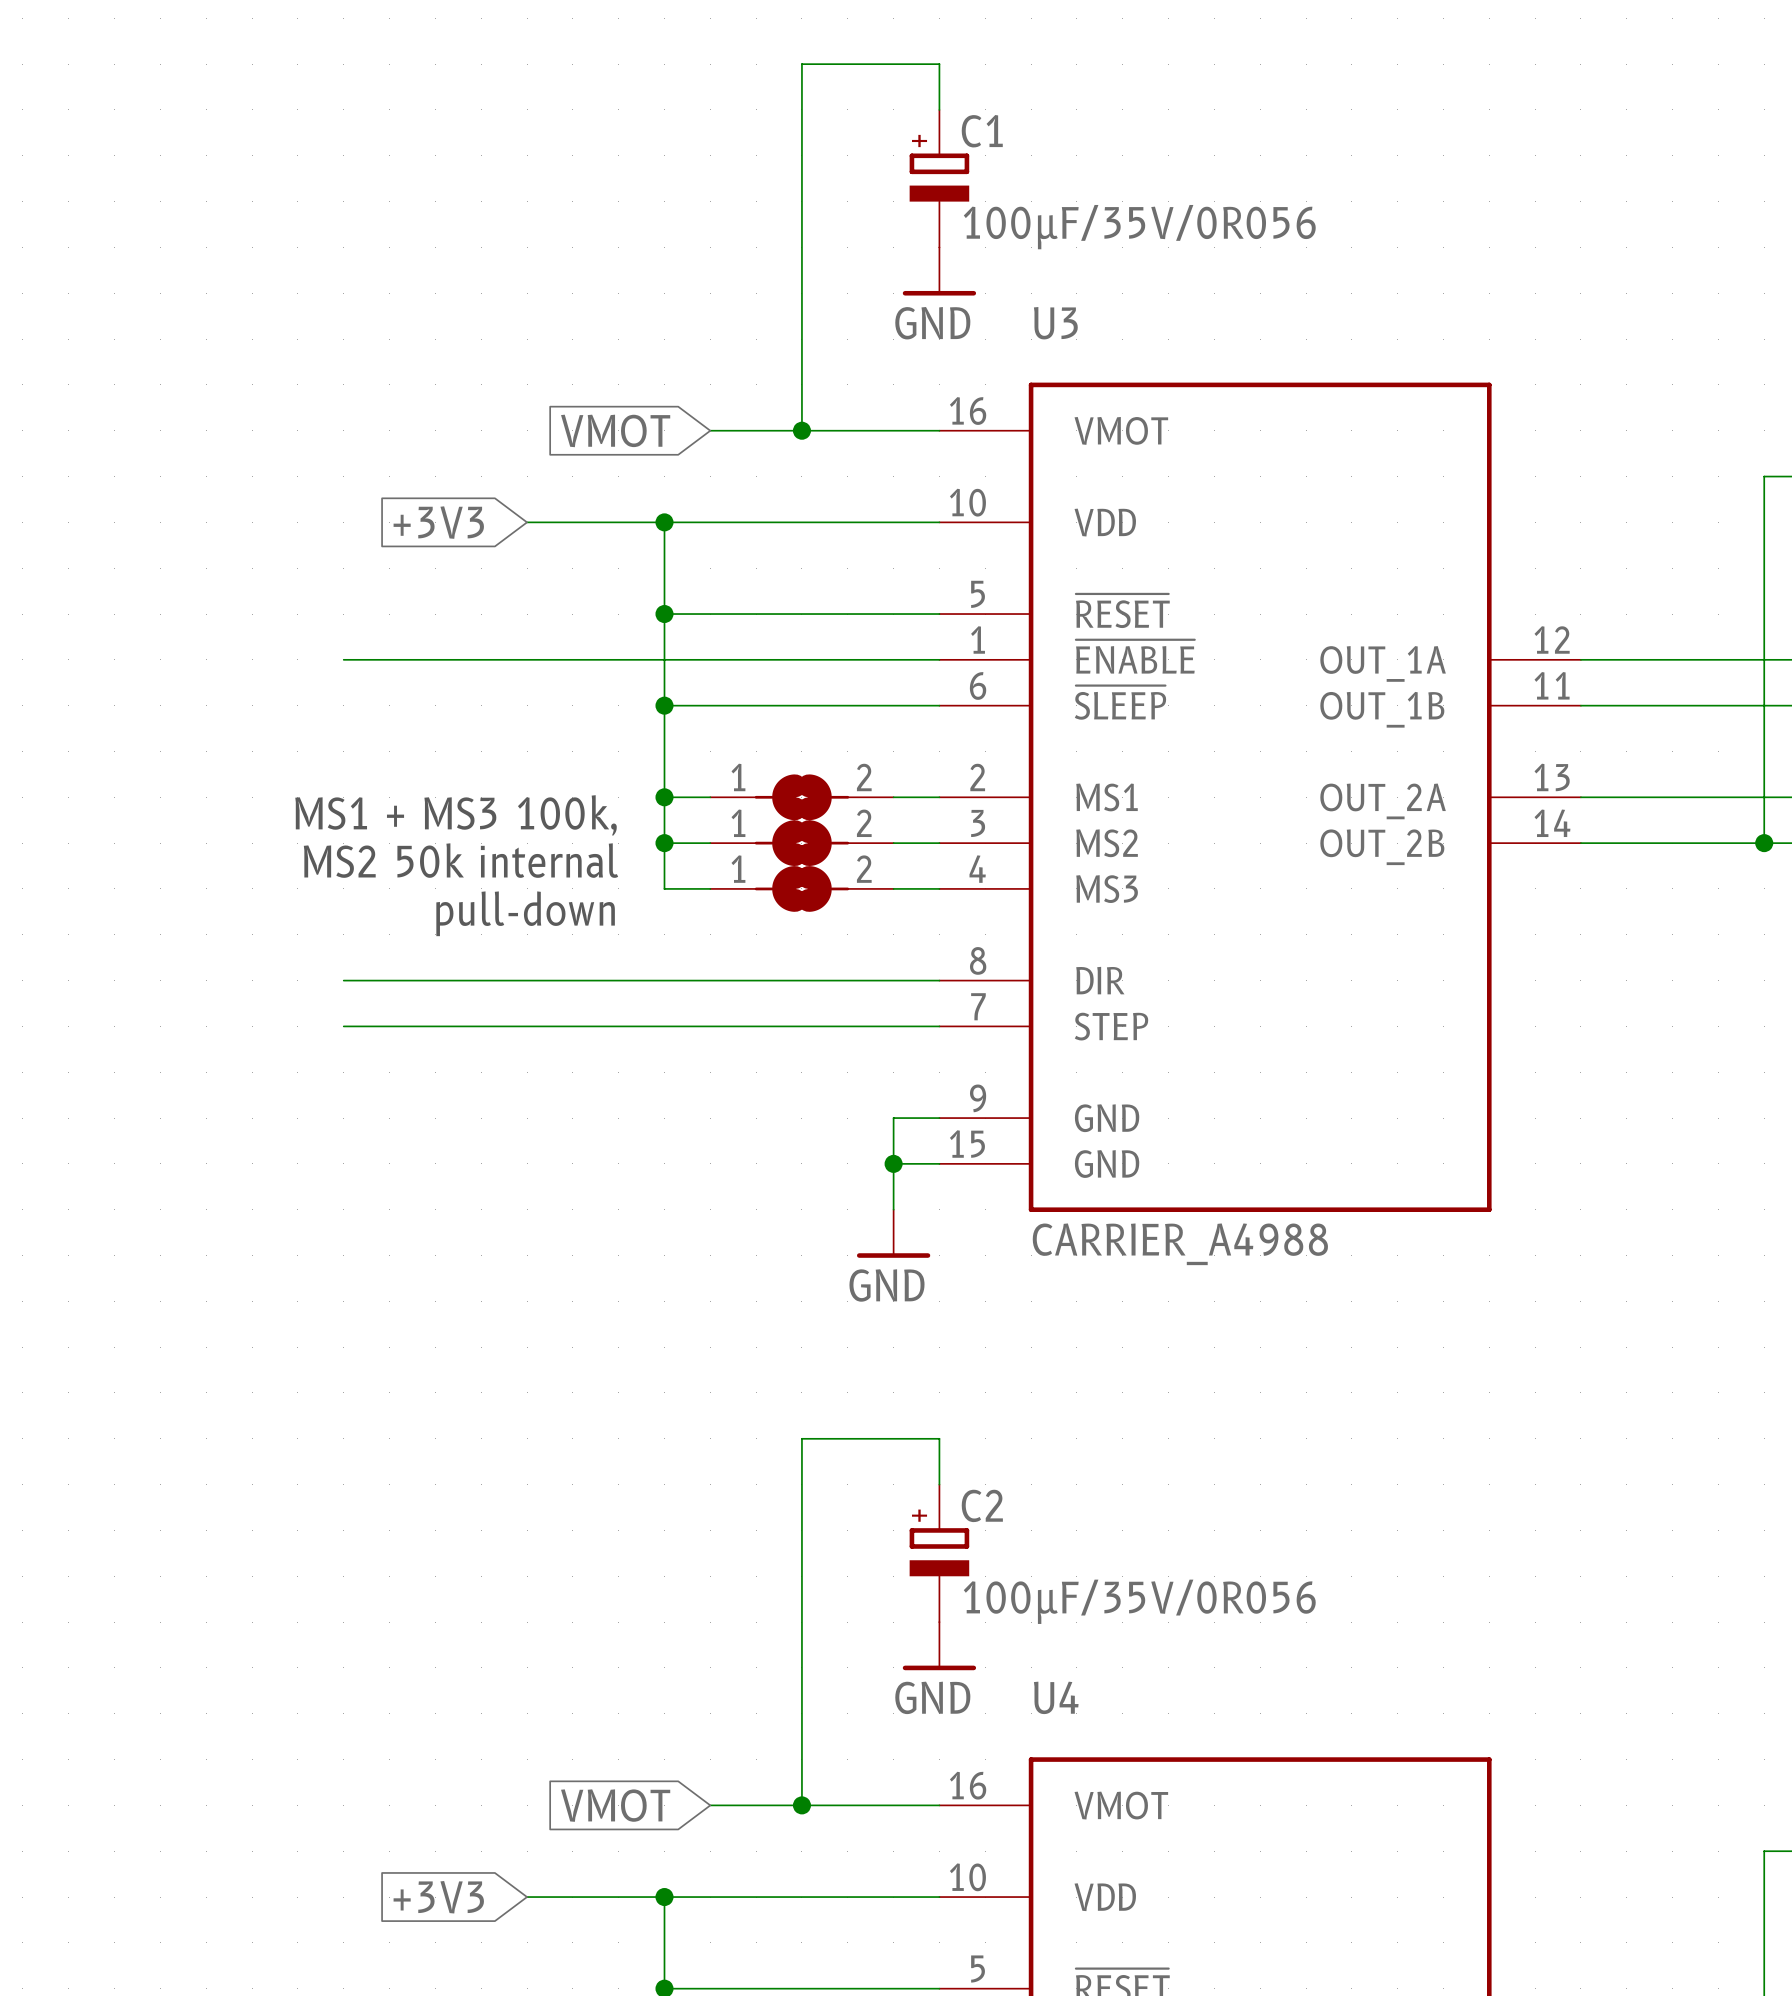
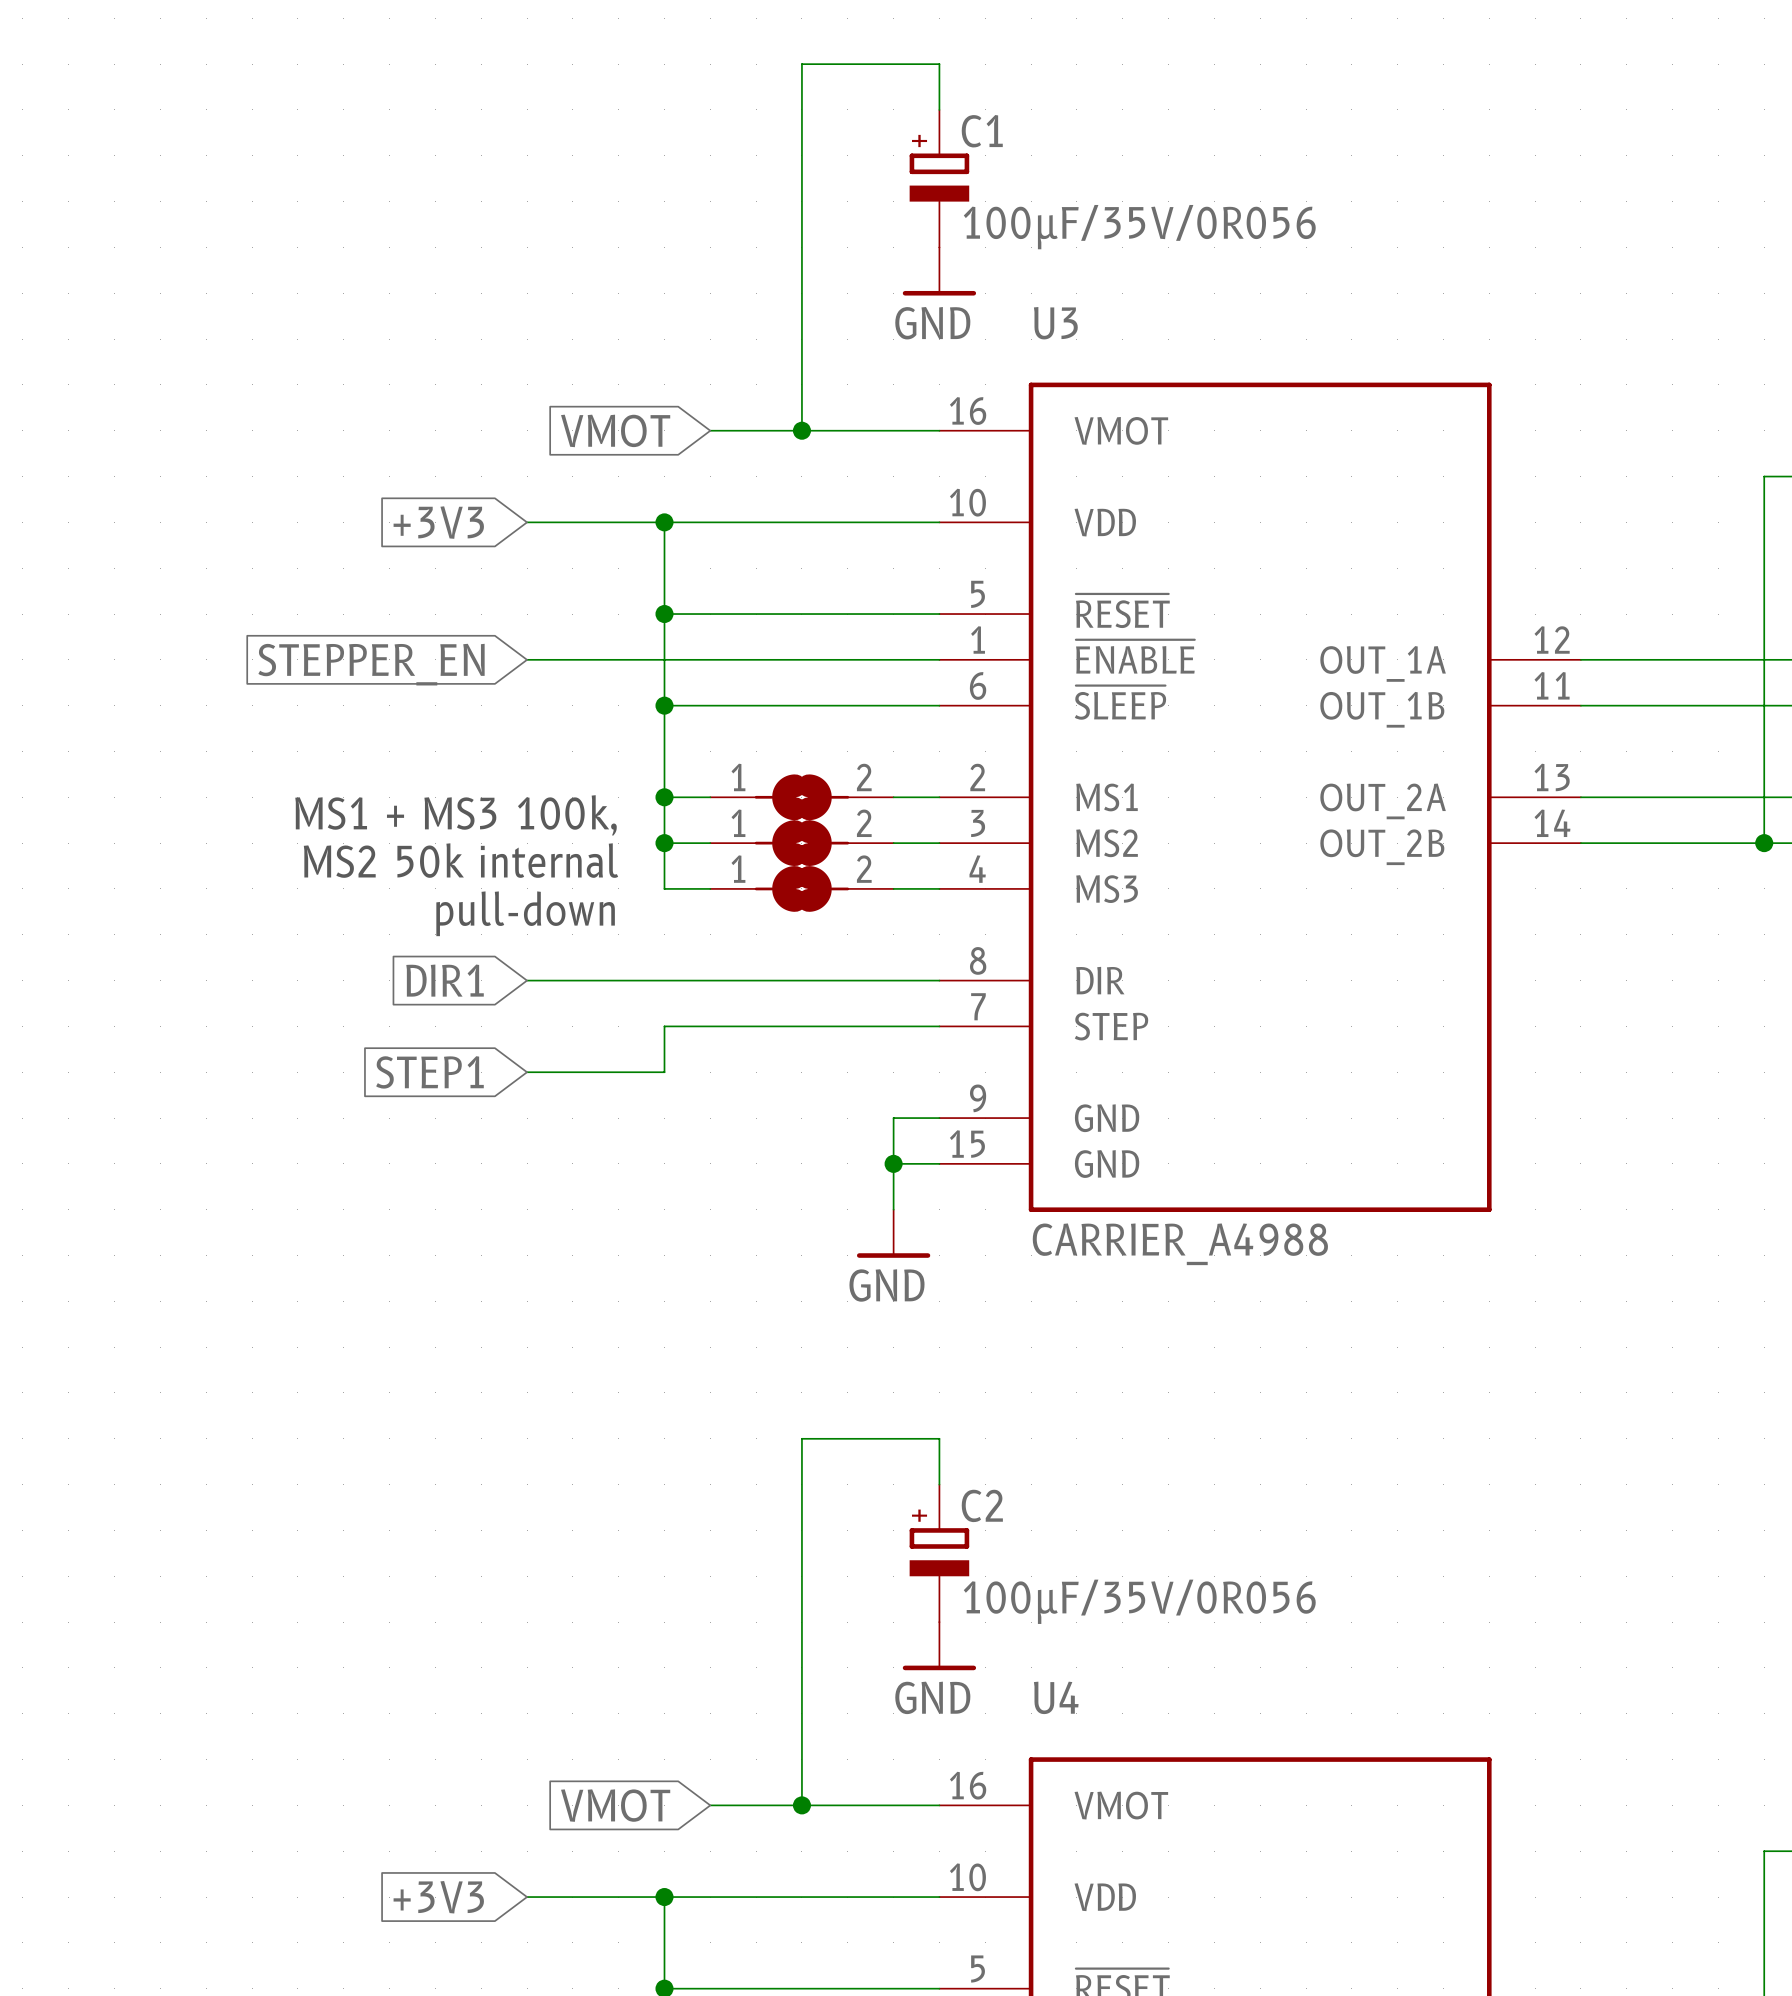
wire: (343, 659) (527, 659) -> none
global label: none -> STEPPER_EN (371, 664)
wire: (343, 980) (527, 980) -> none
global label: none -> DIR1 (445, 980)
wire: (343, 1026) (664, 1026) -> (527, 1072) (664, 1072) (664, 1026)
global label: none -> STEP1 (429, 1072)

